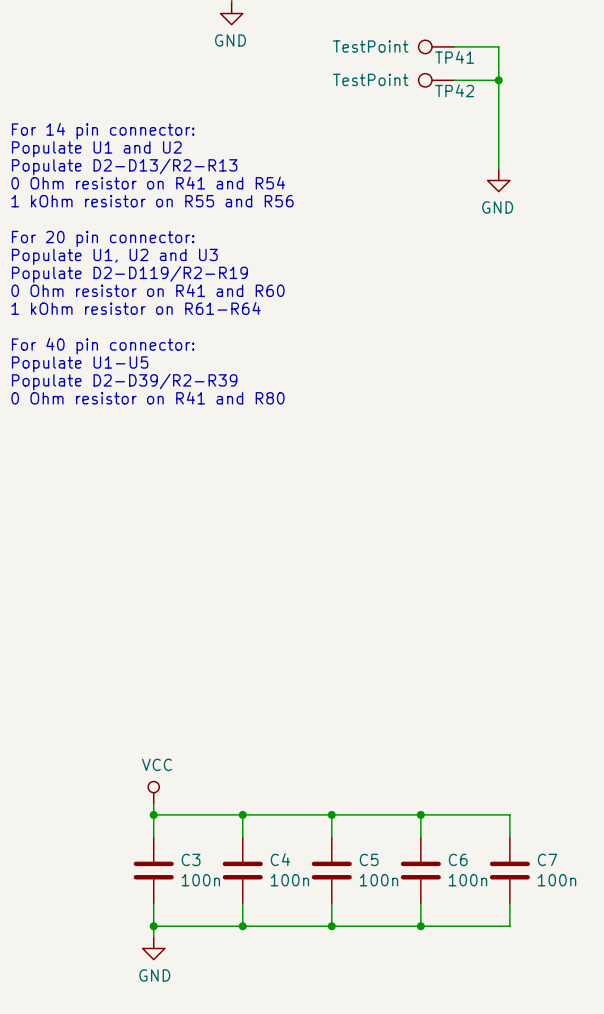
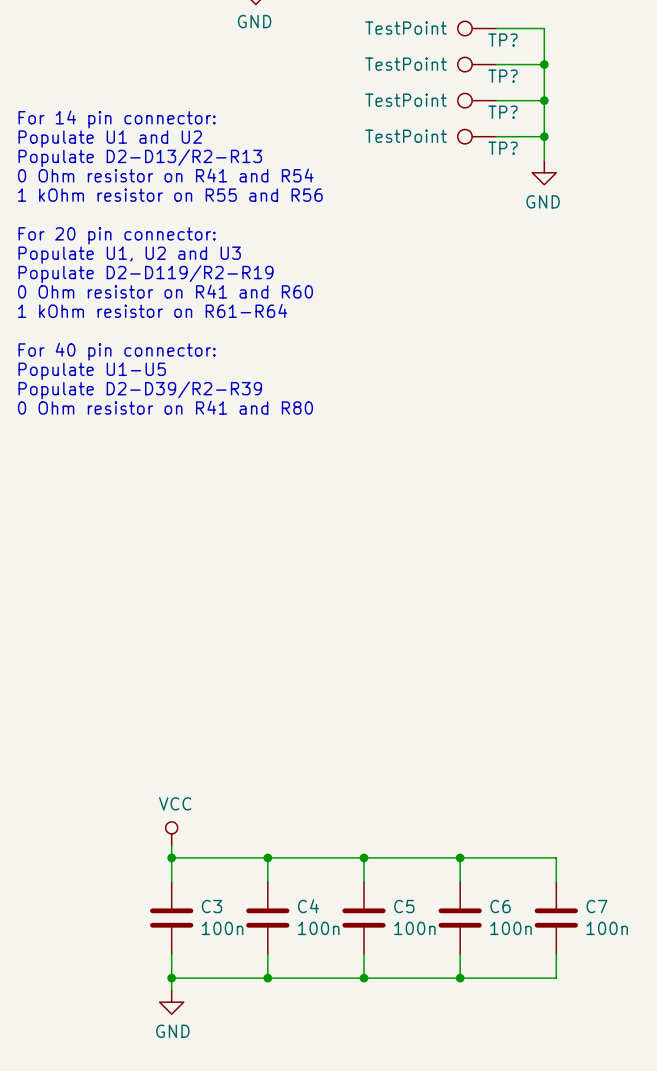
TP41 name: TP41 (454, 57) -> TP? (503, 40)
TP42 name: TP42 (454, 90) -> TP? (503, 76)
TP?: none -> TestPoint (476, 100)
wire: none -> (496, 100) (544, 100)
junction: none -> (544, 100)
TP?: none -> TestPoint (476, 136)
wire: none -> (496, 136) (544, 136)
junction: none -> (544, 136)

